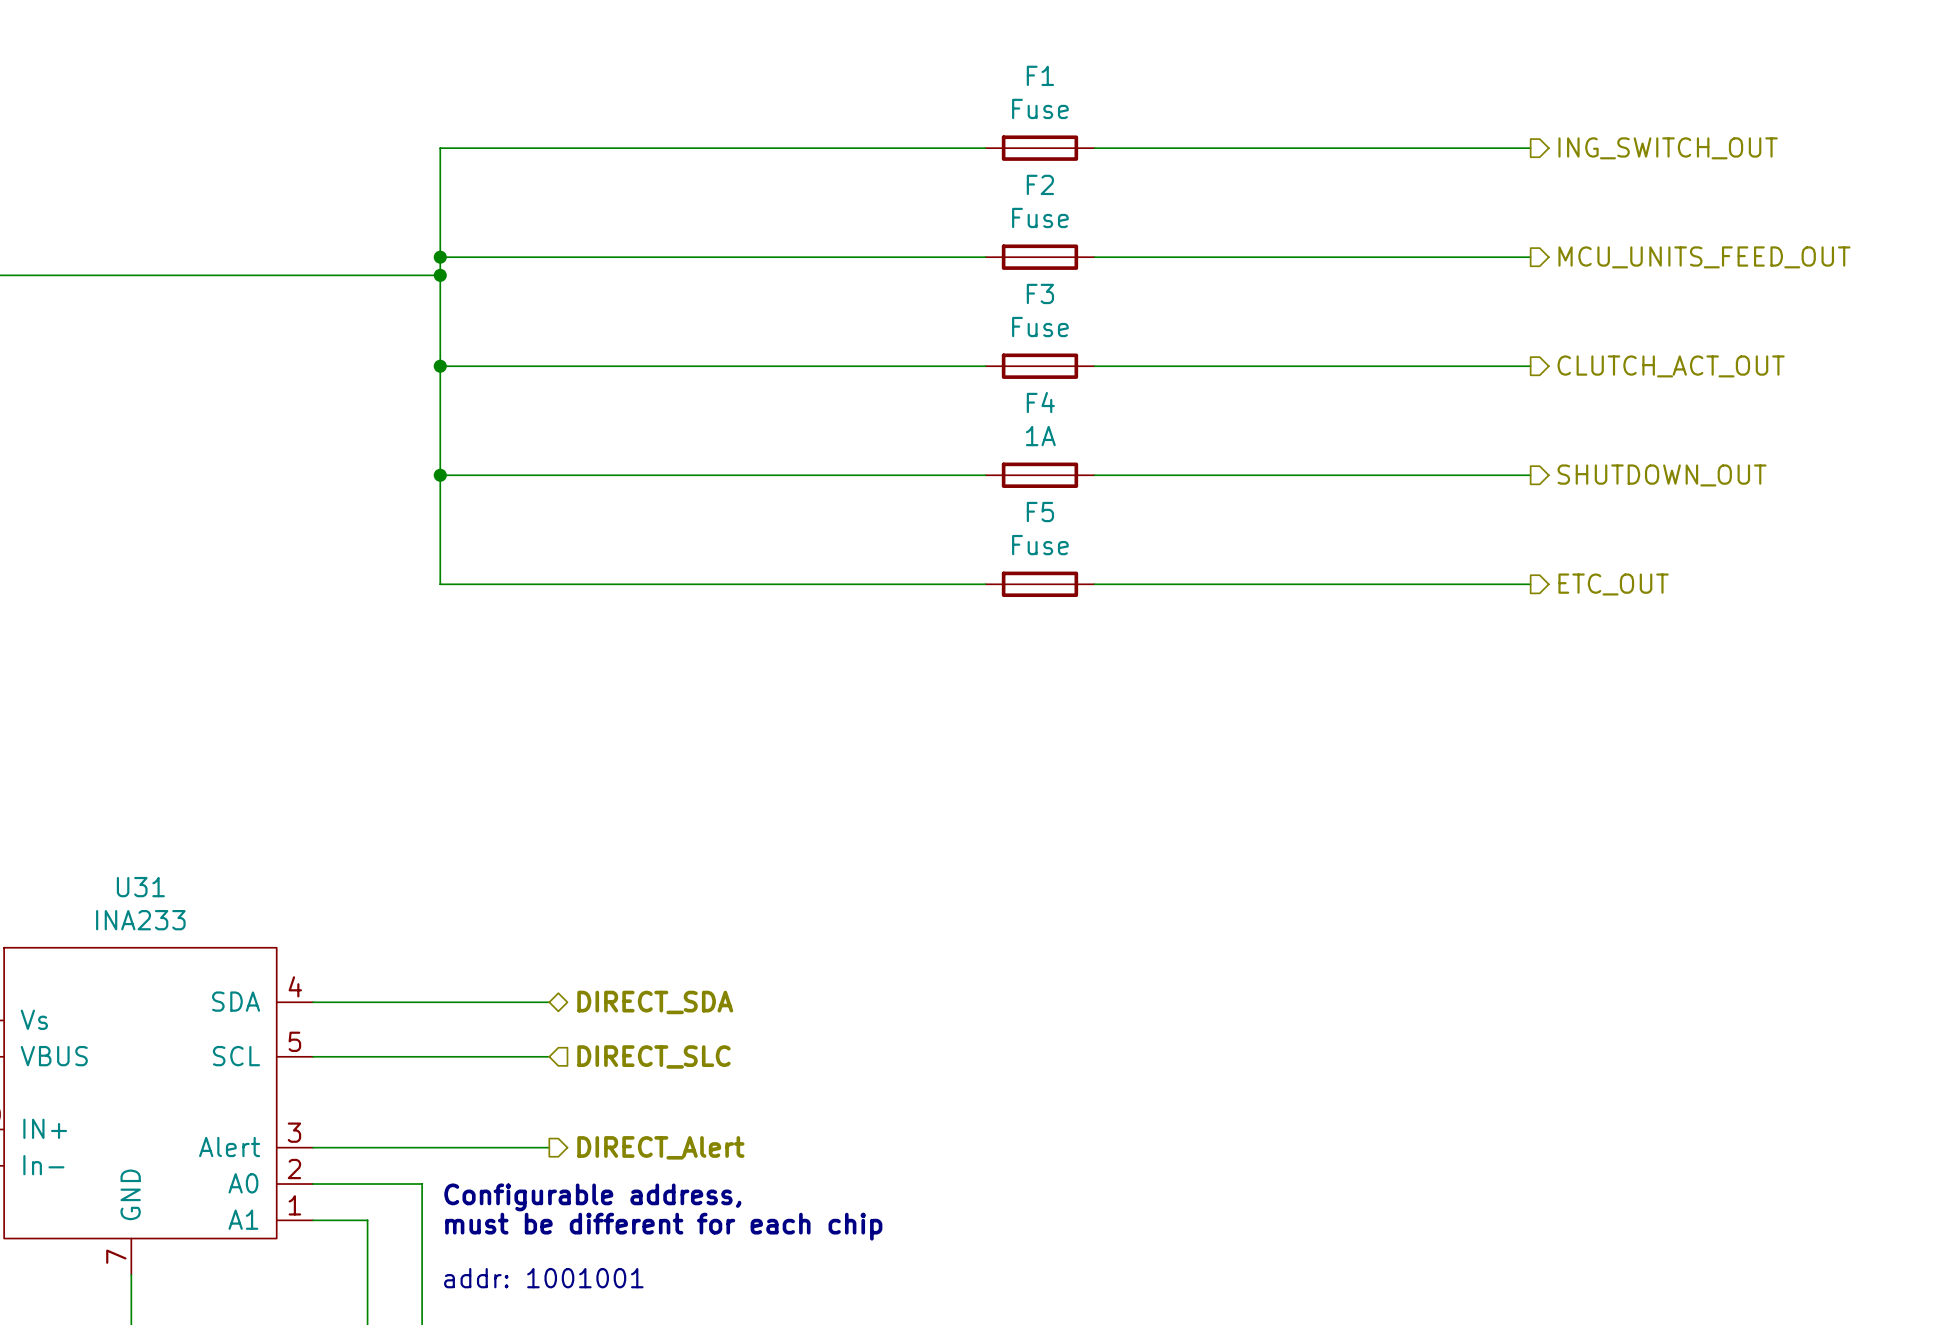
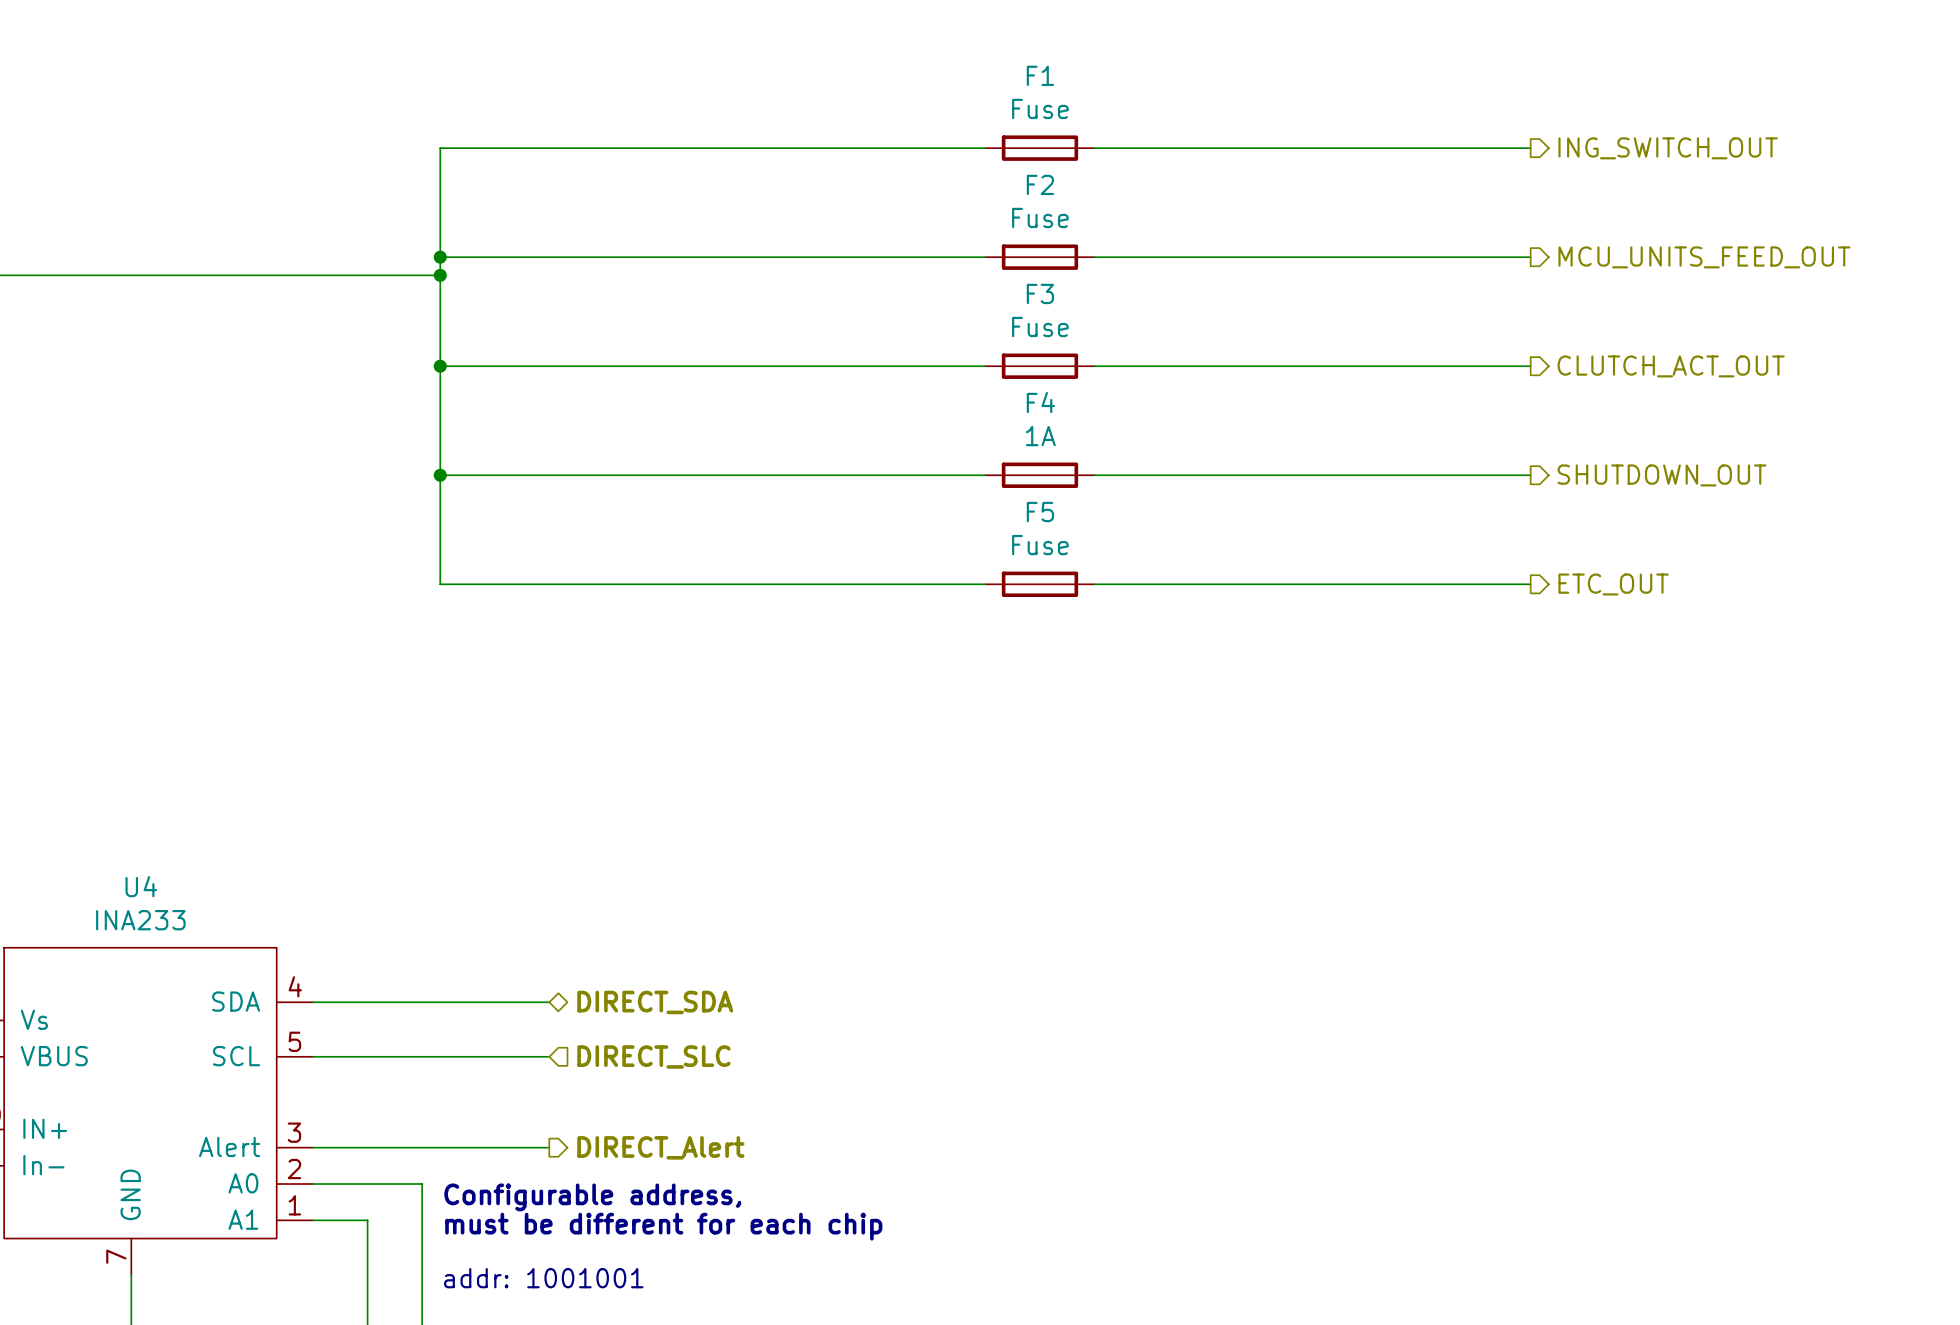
U31 name: U31 (140, 887) -> U4 (141, 886)

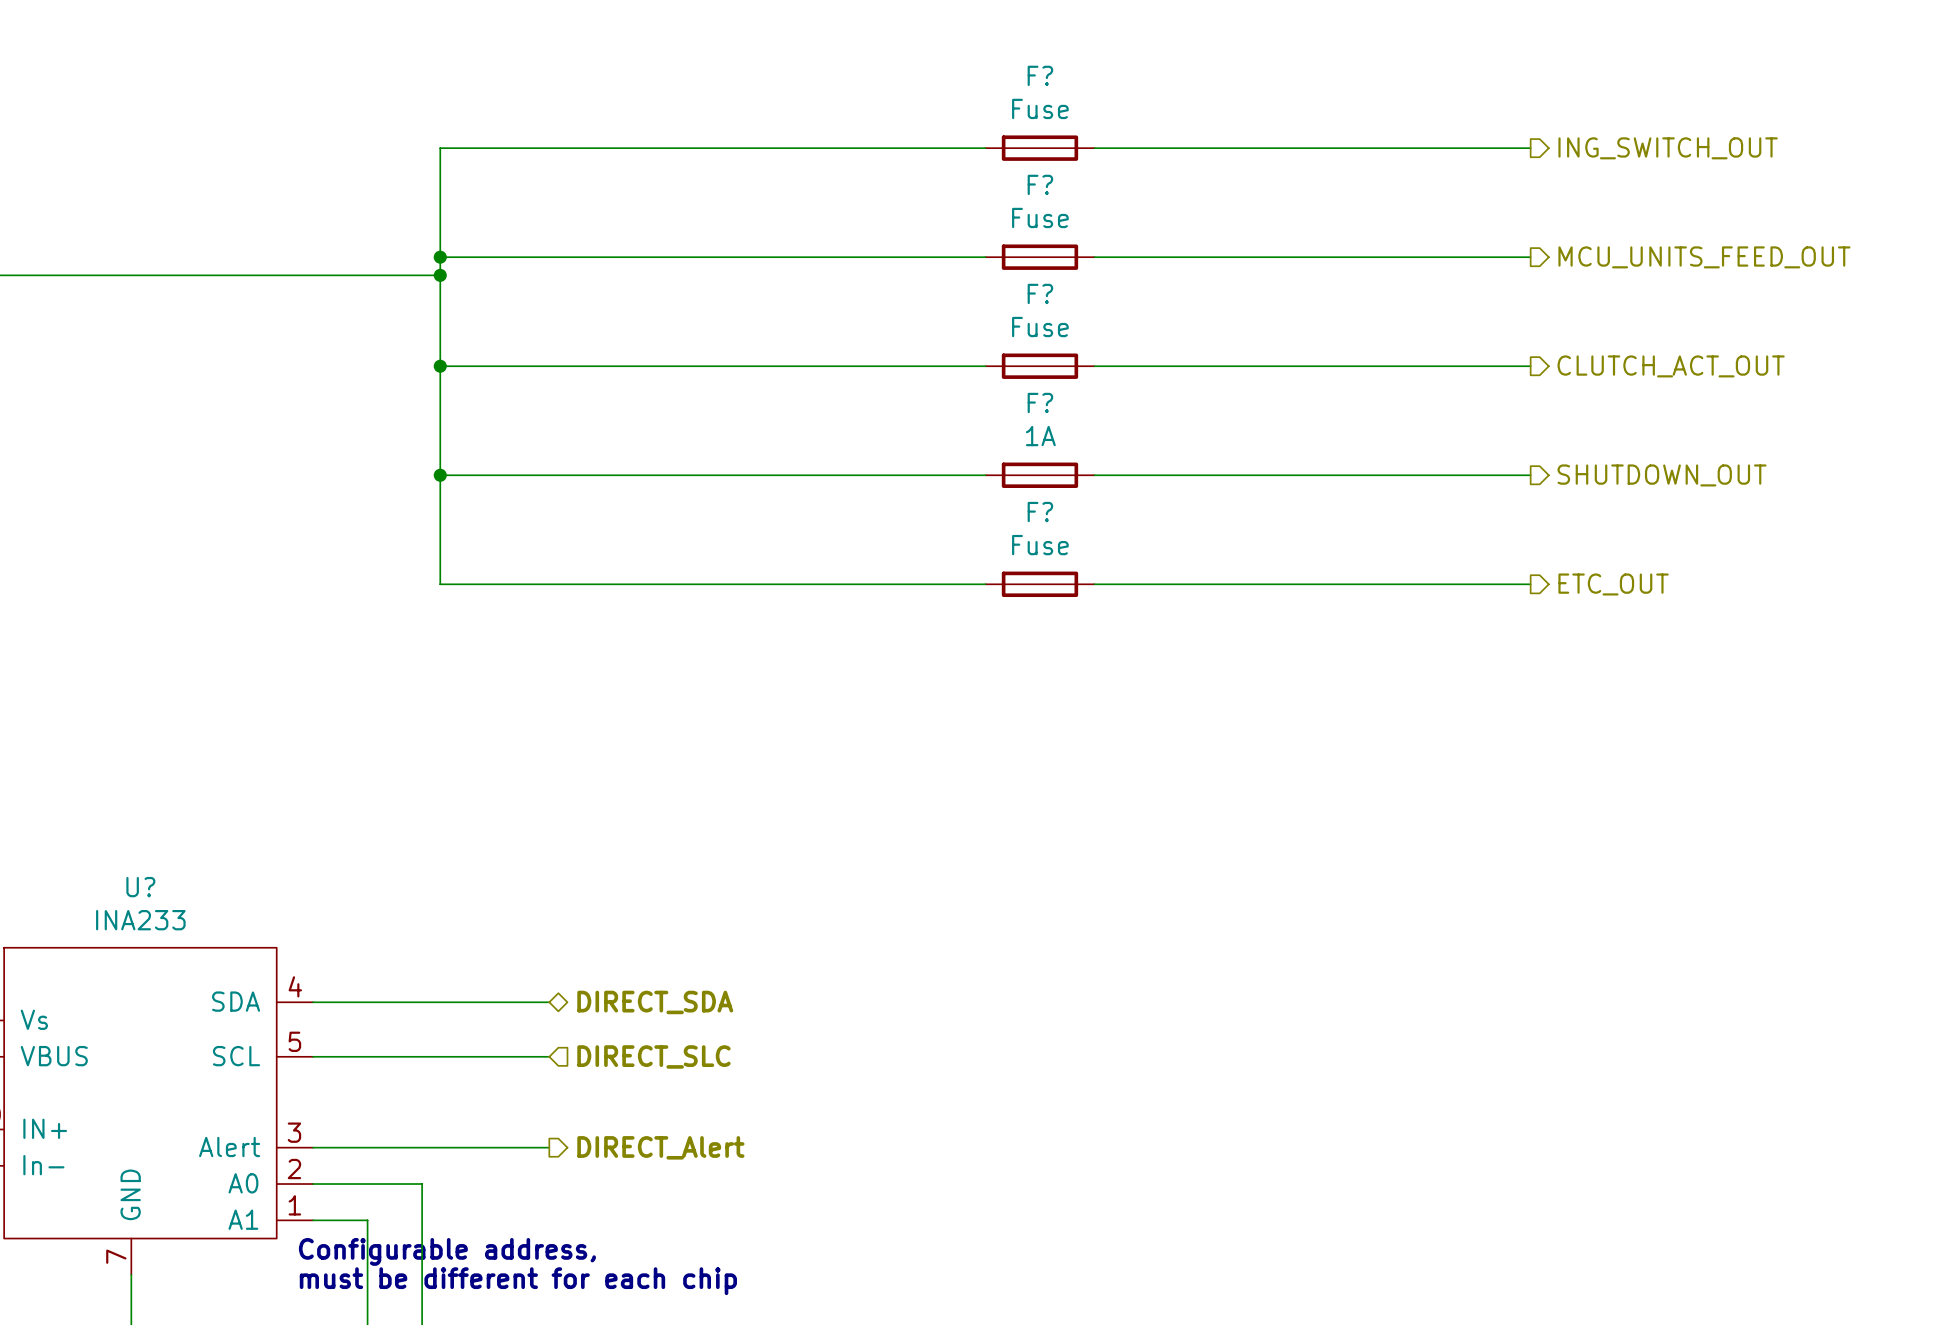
F1 name: F1 (1040, 75) -> F? (1040, 75)
F2 name: F2 (1040, 184) -> F? (1040, 184)
F3 name: F3 (1040, 293) -> F? (1040, 293)
F4 name: F4 (1040, 402) -> F? (1040, 402)
F5 name: F5 (1040, 512) -> F? (1040, 512)
U4 name: U4 (141, 886) -> U? (140, 887)
text position: Configurable address, (592, 1197) -> Configurable address, (447, 1251)
text position: must be different for each chip (663, 1226) -> must be different for each chip (518, 1281)
text: addr: 1001001 (543, 1278) -> none

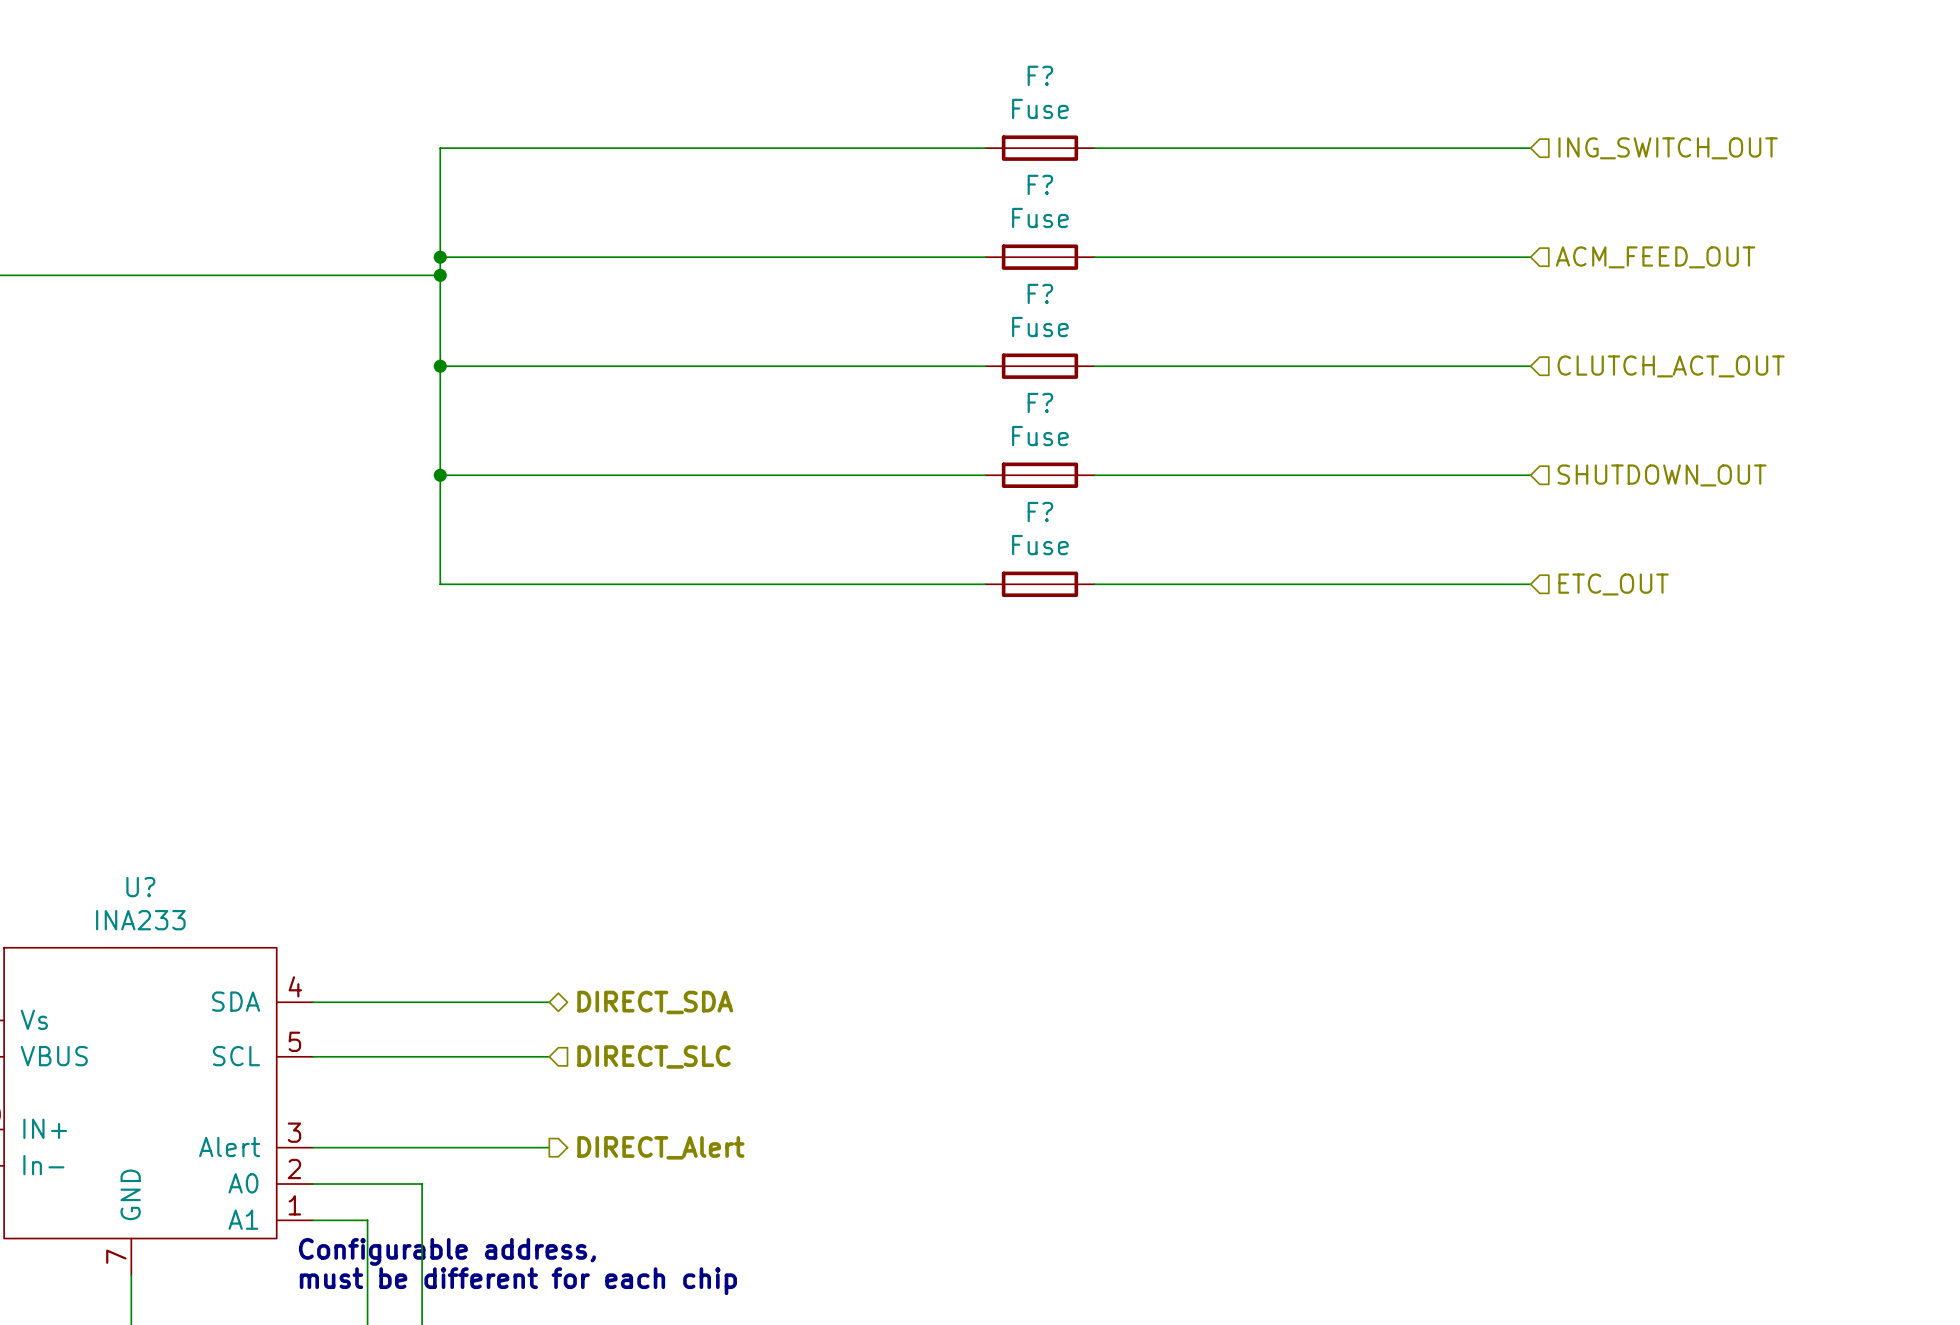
hierarchical label shape: output (1668, 148) -> input (1668, 148)
hierarchical label shape: output (1704, 257) -> input (1655, 257)
hierarchical label: MCU_UNITS_FEED_OUT (1704, 257) -> ACM_FEED_OUT (1655, 257)
hierarchical label shape: output (1671, 366) -> input (1671, 366)
F? value: 1A (1040, 436) -> Fuse (1040, 436)
hierarchical label shape: output (1662, 475) -> input (1662, 475)
hierarchical label shape: output (1613, 584) -> input (1613, 584)

